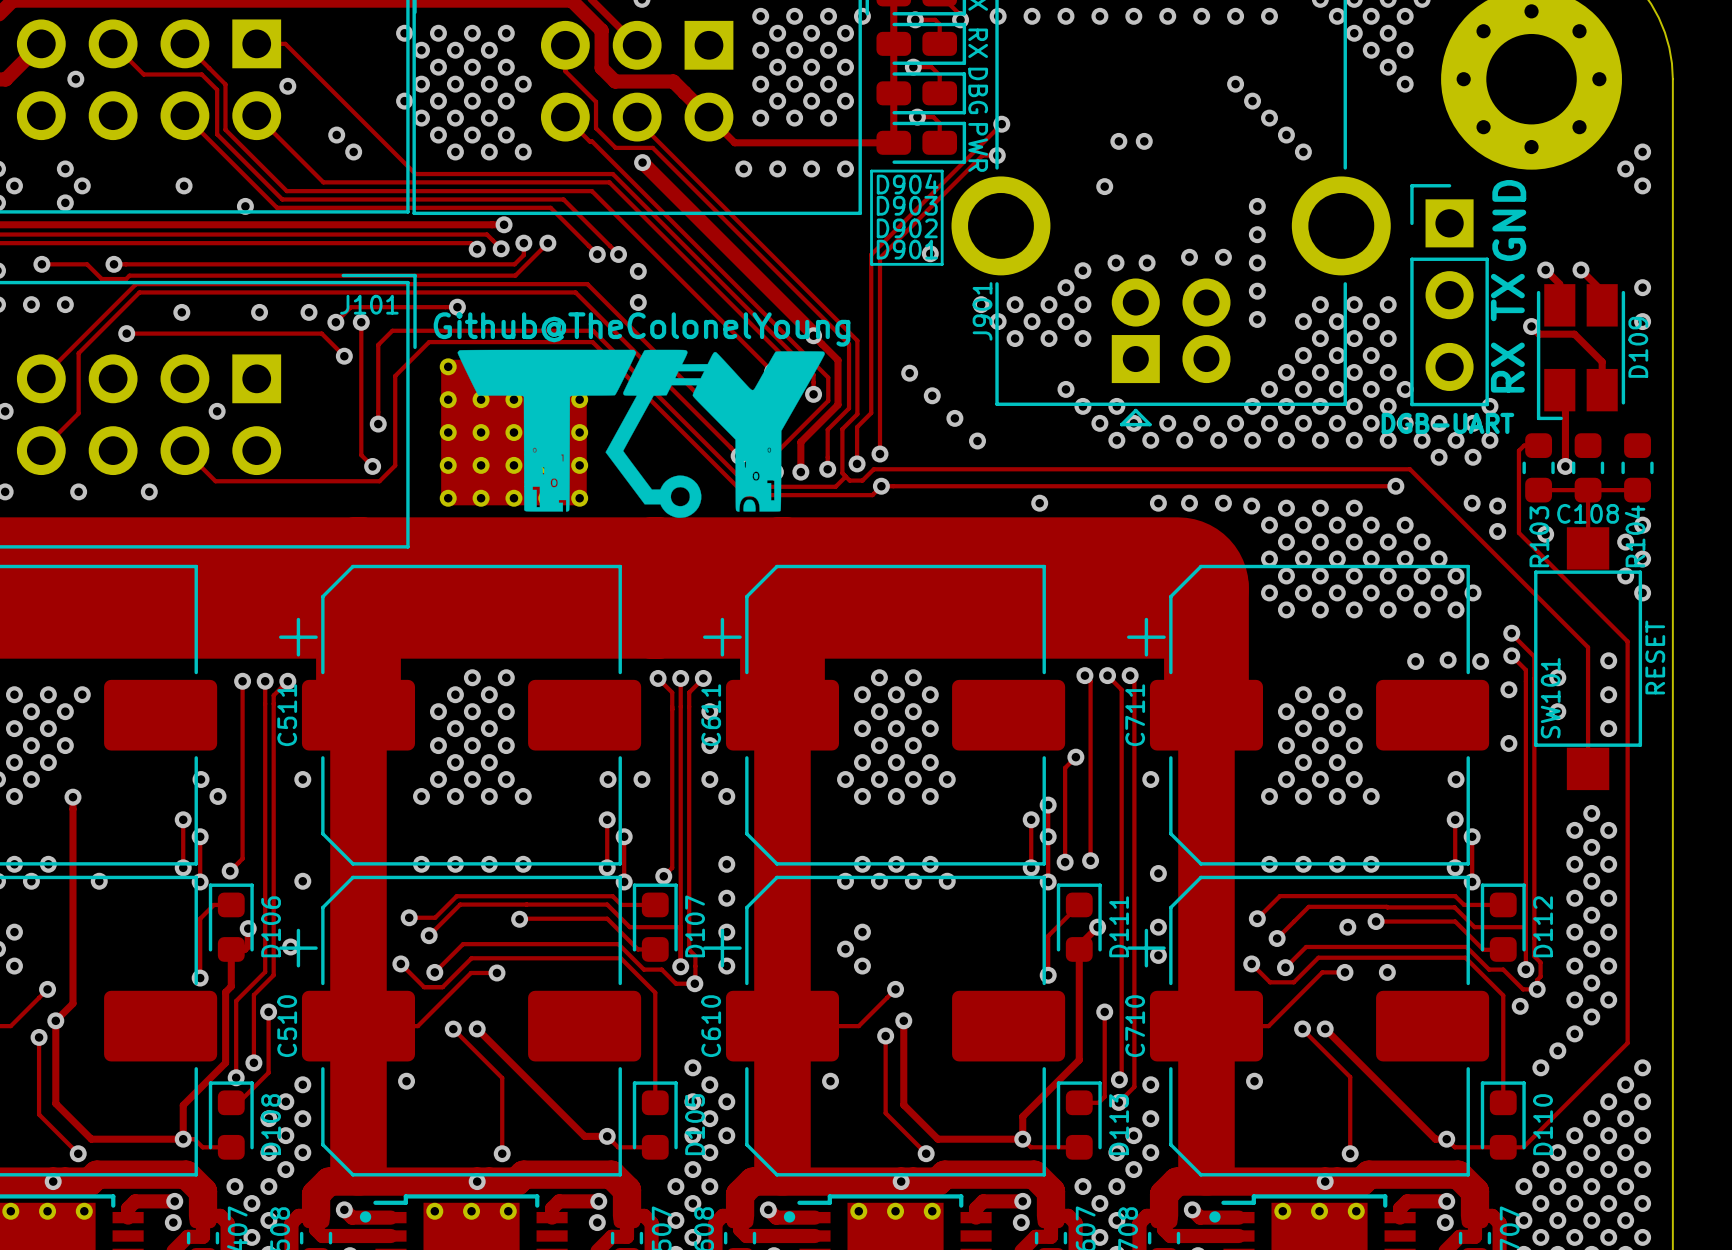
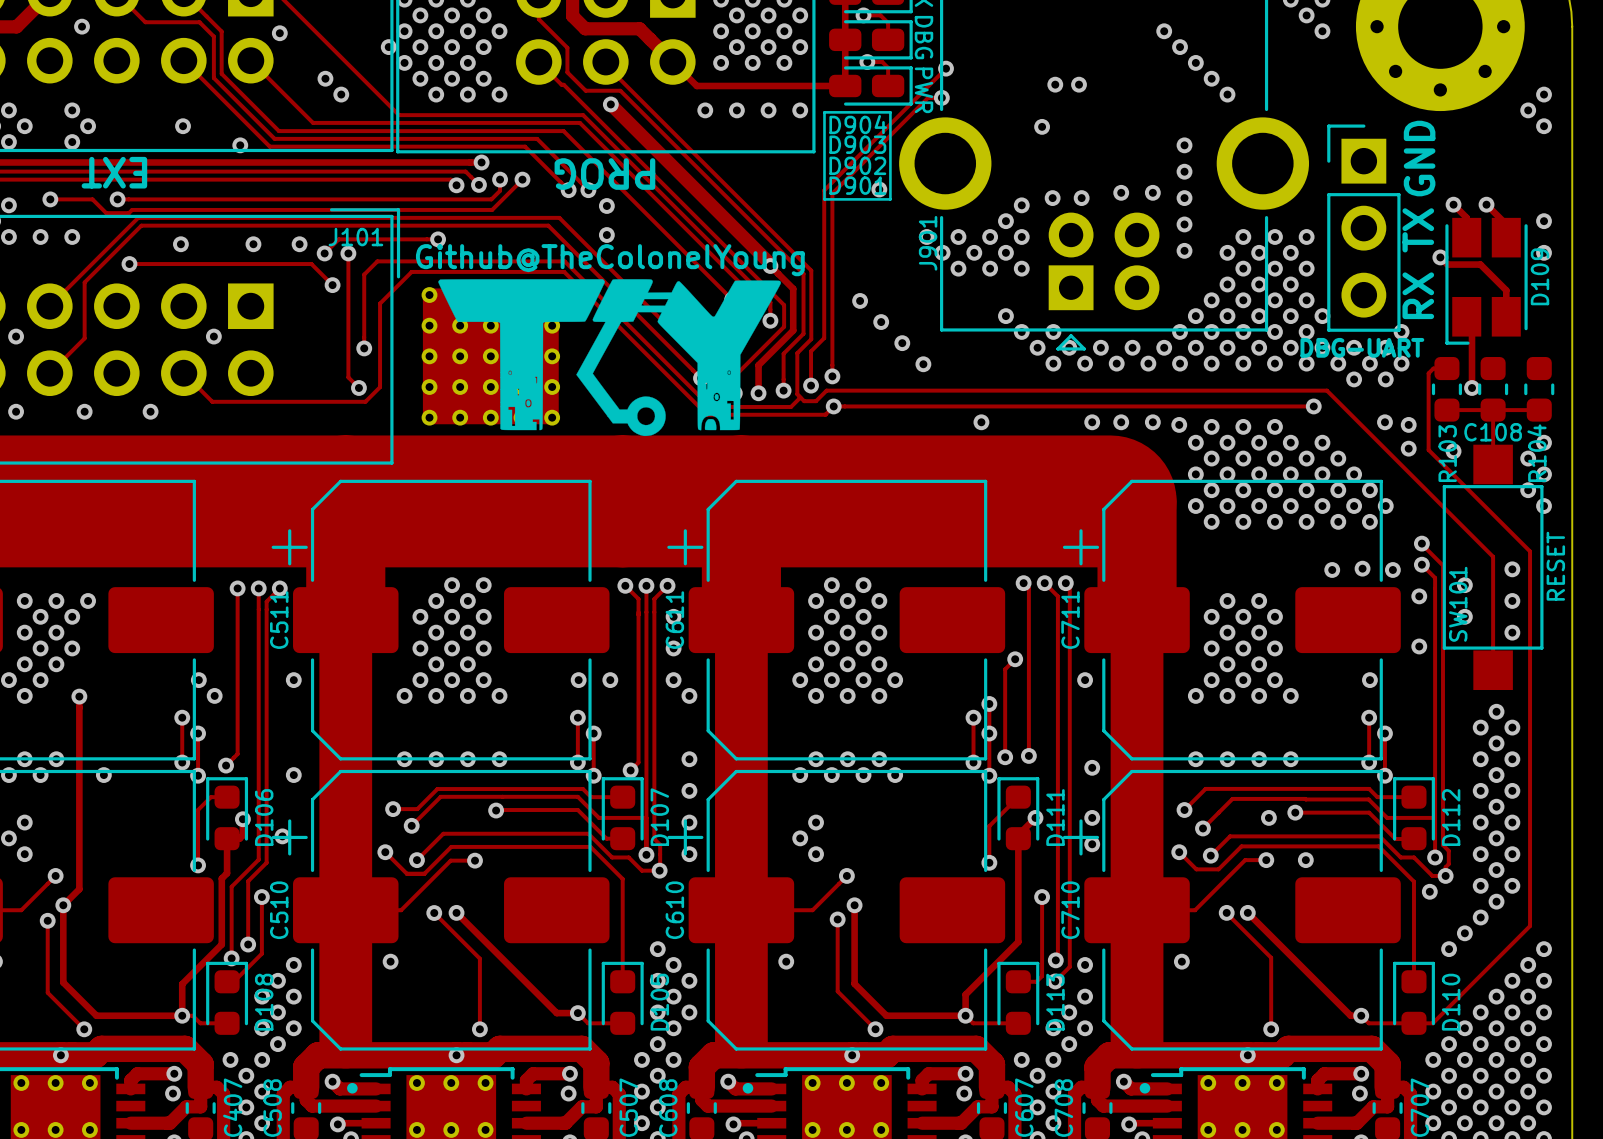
text: none -> EXT (114, 172)
text: none -> PROG (604, 174)
text: DGB-UART (1447, 423) -> DBG-UART (1362, 347)

